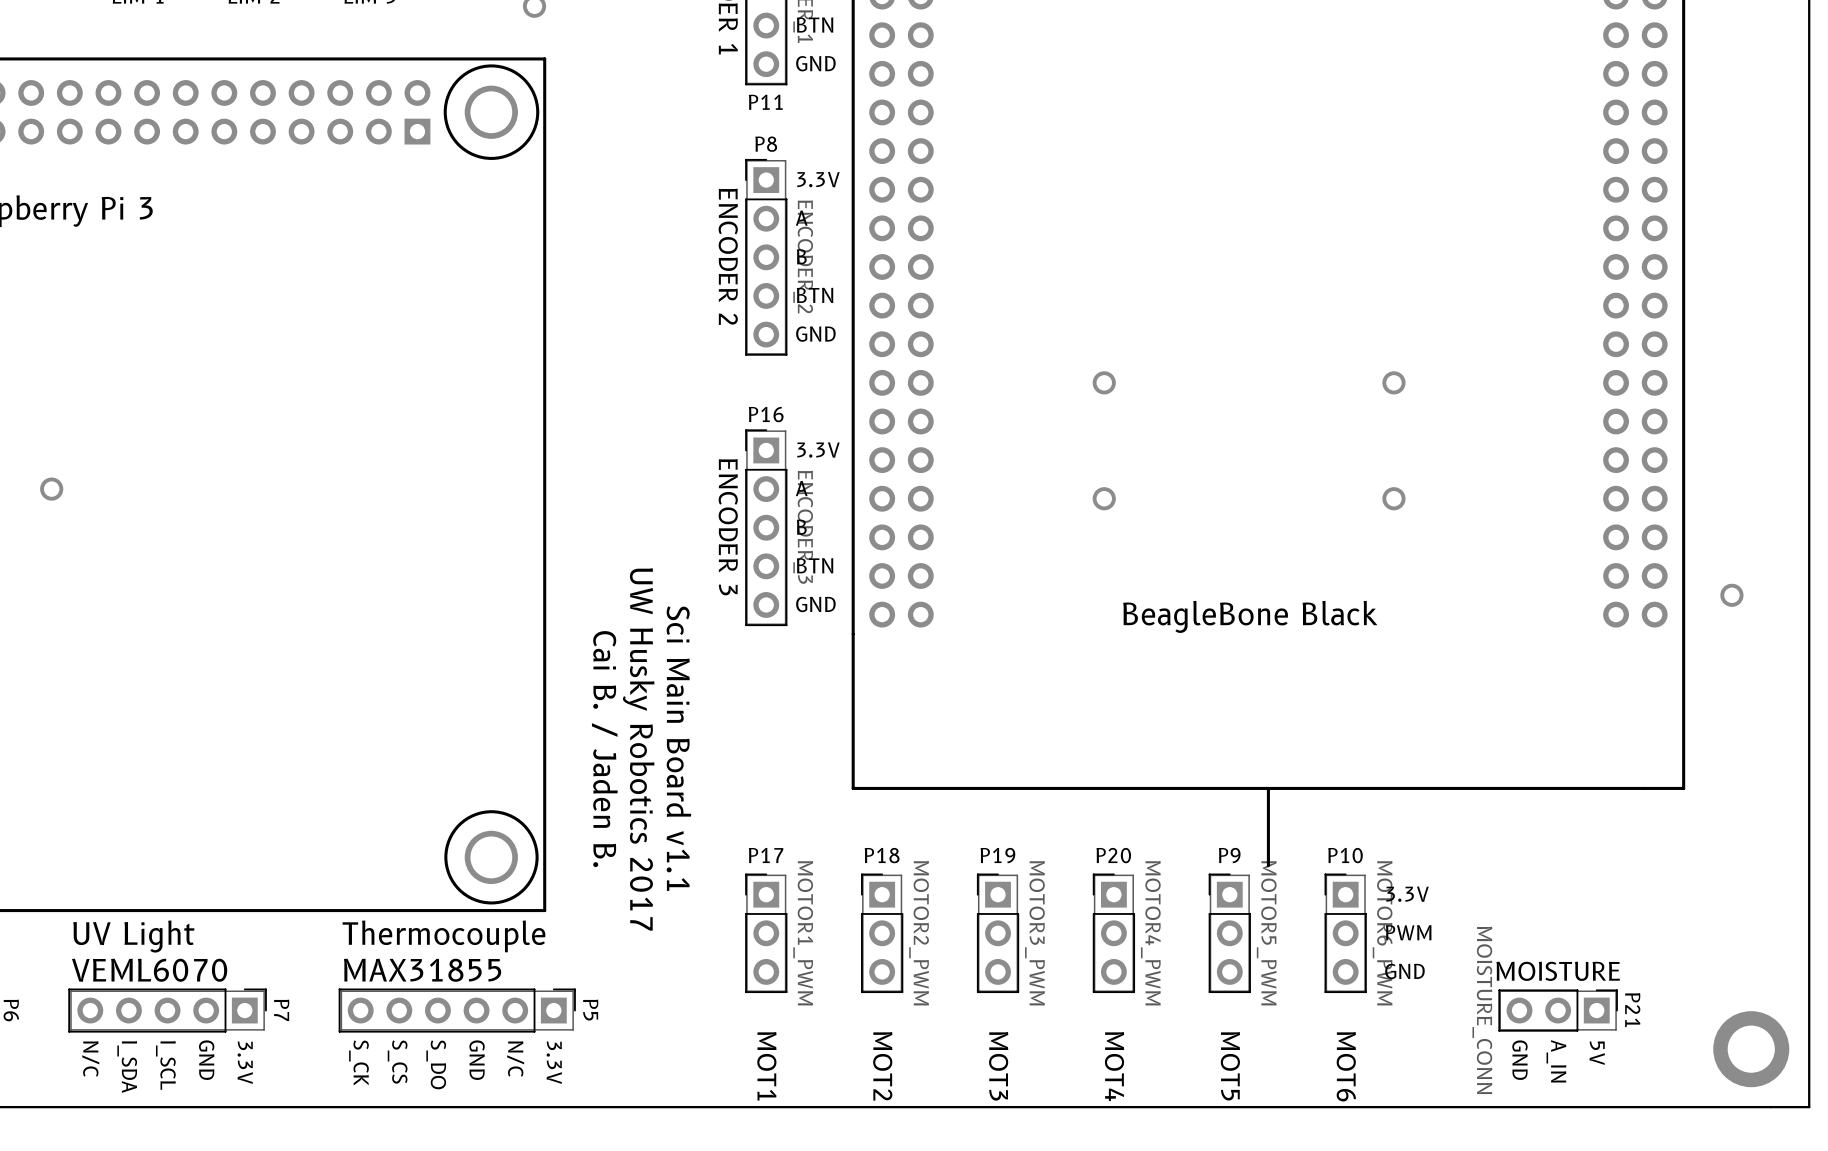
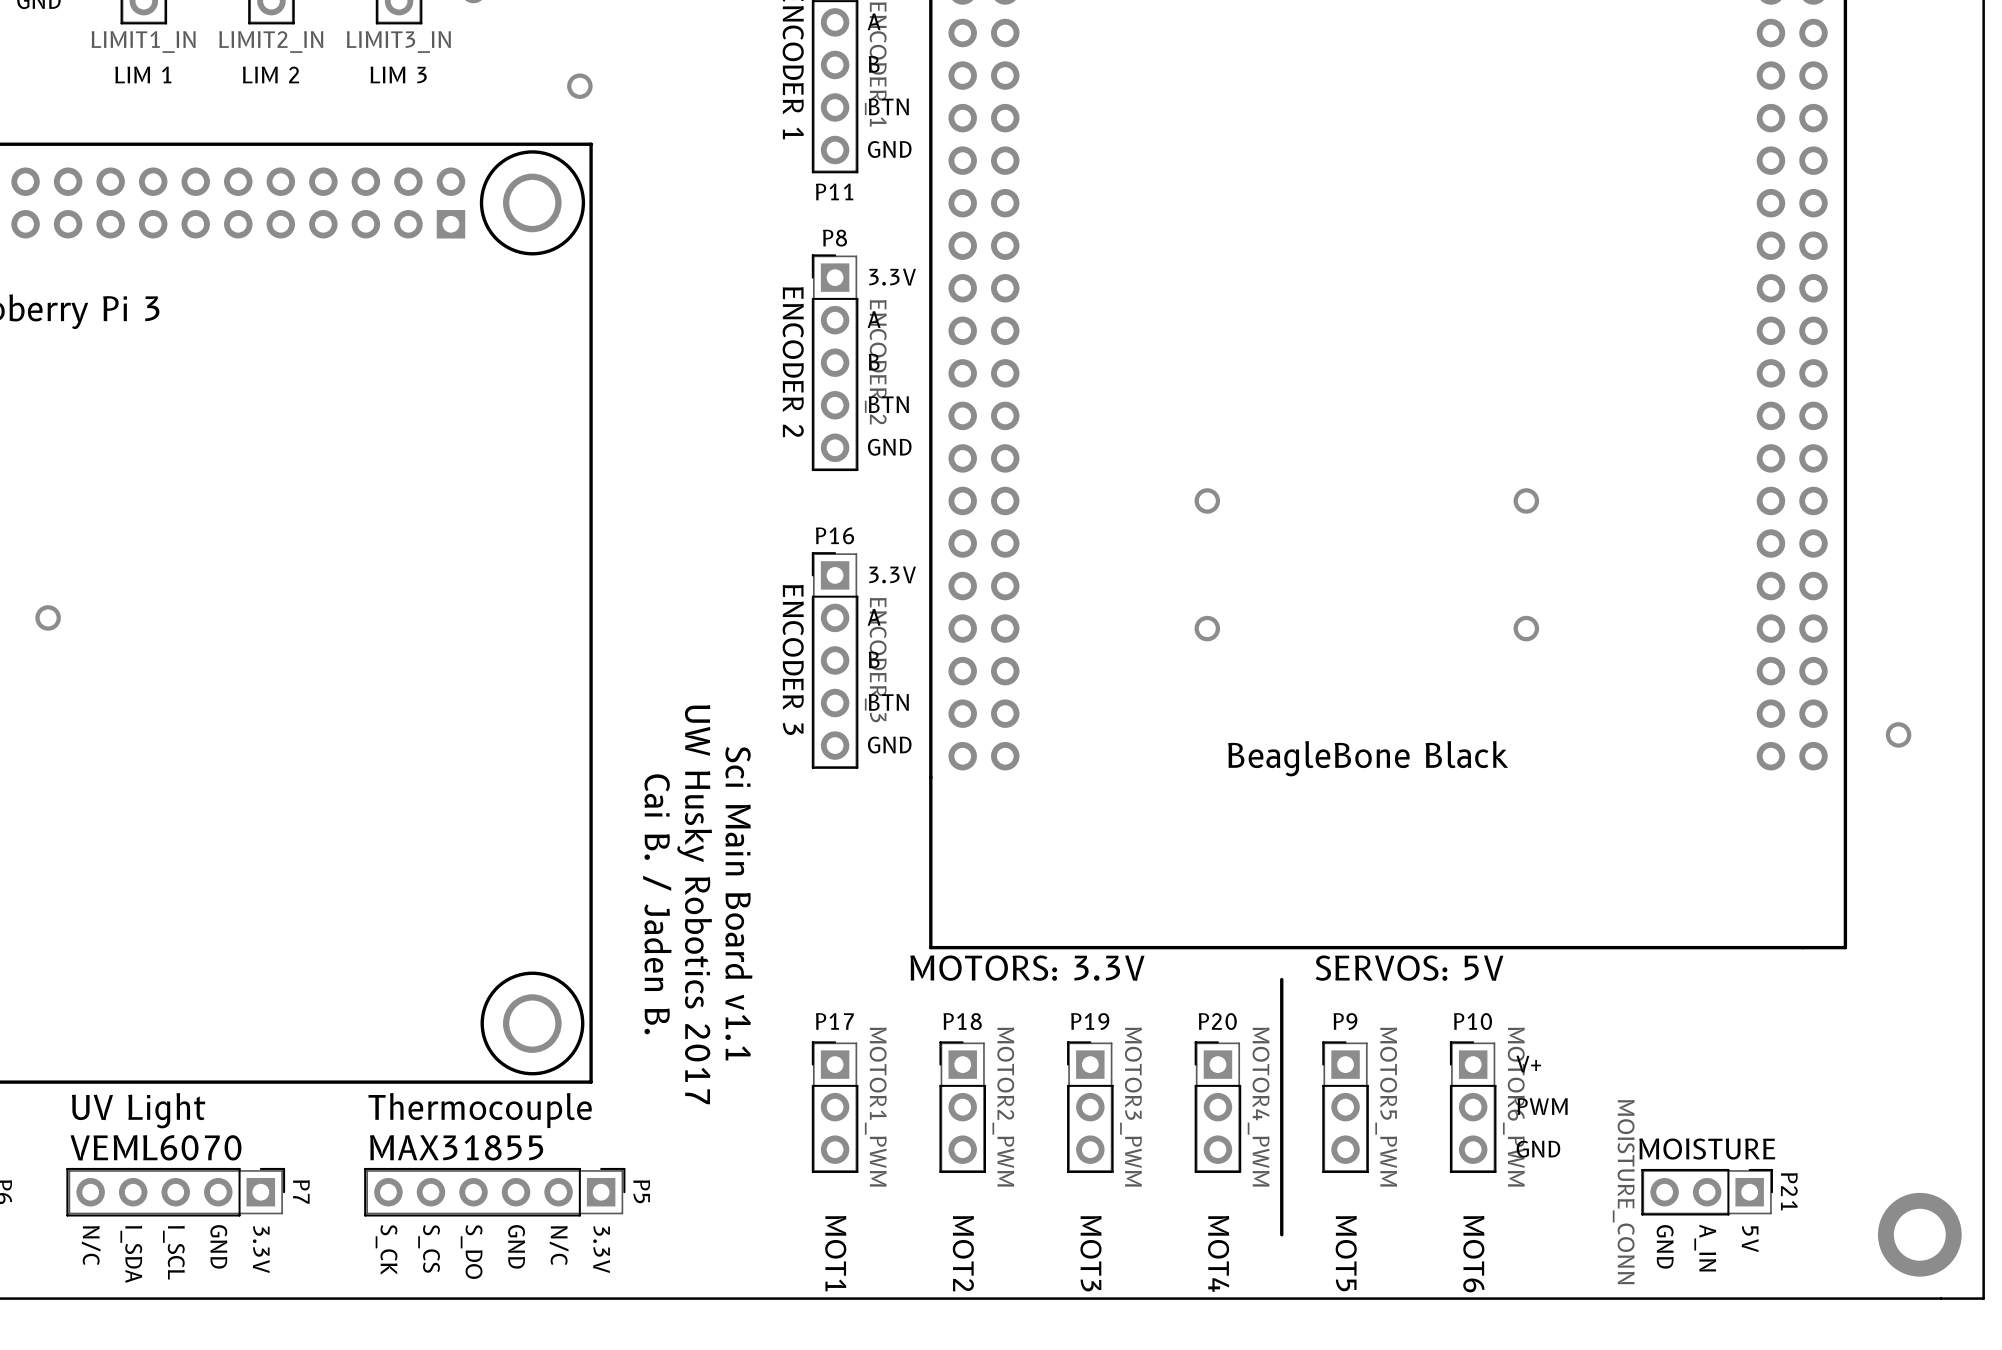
line: (1268, 788) (1268, 865) -> none
text: none -> MOTORS: 3.3V (1027, 968)
text: none -> SERVOS: 5V (1409, 968)
line: none -> (1281, 979) (1281, 1234)
text: 3.3V (1407, 894) -> V+ (1528, 1064)

